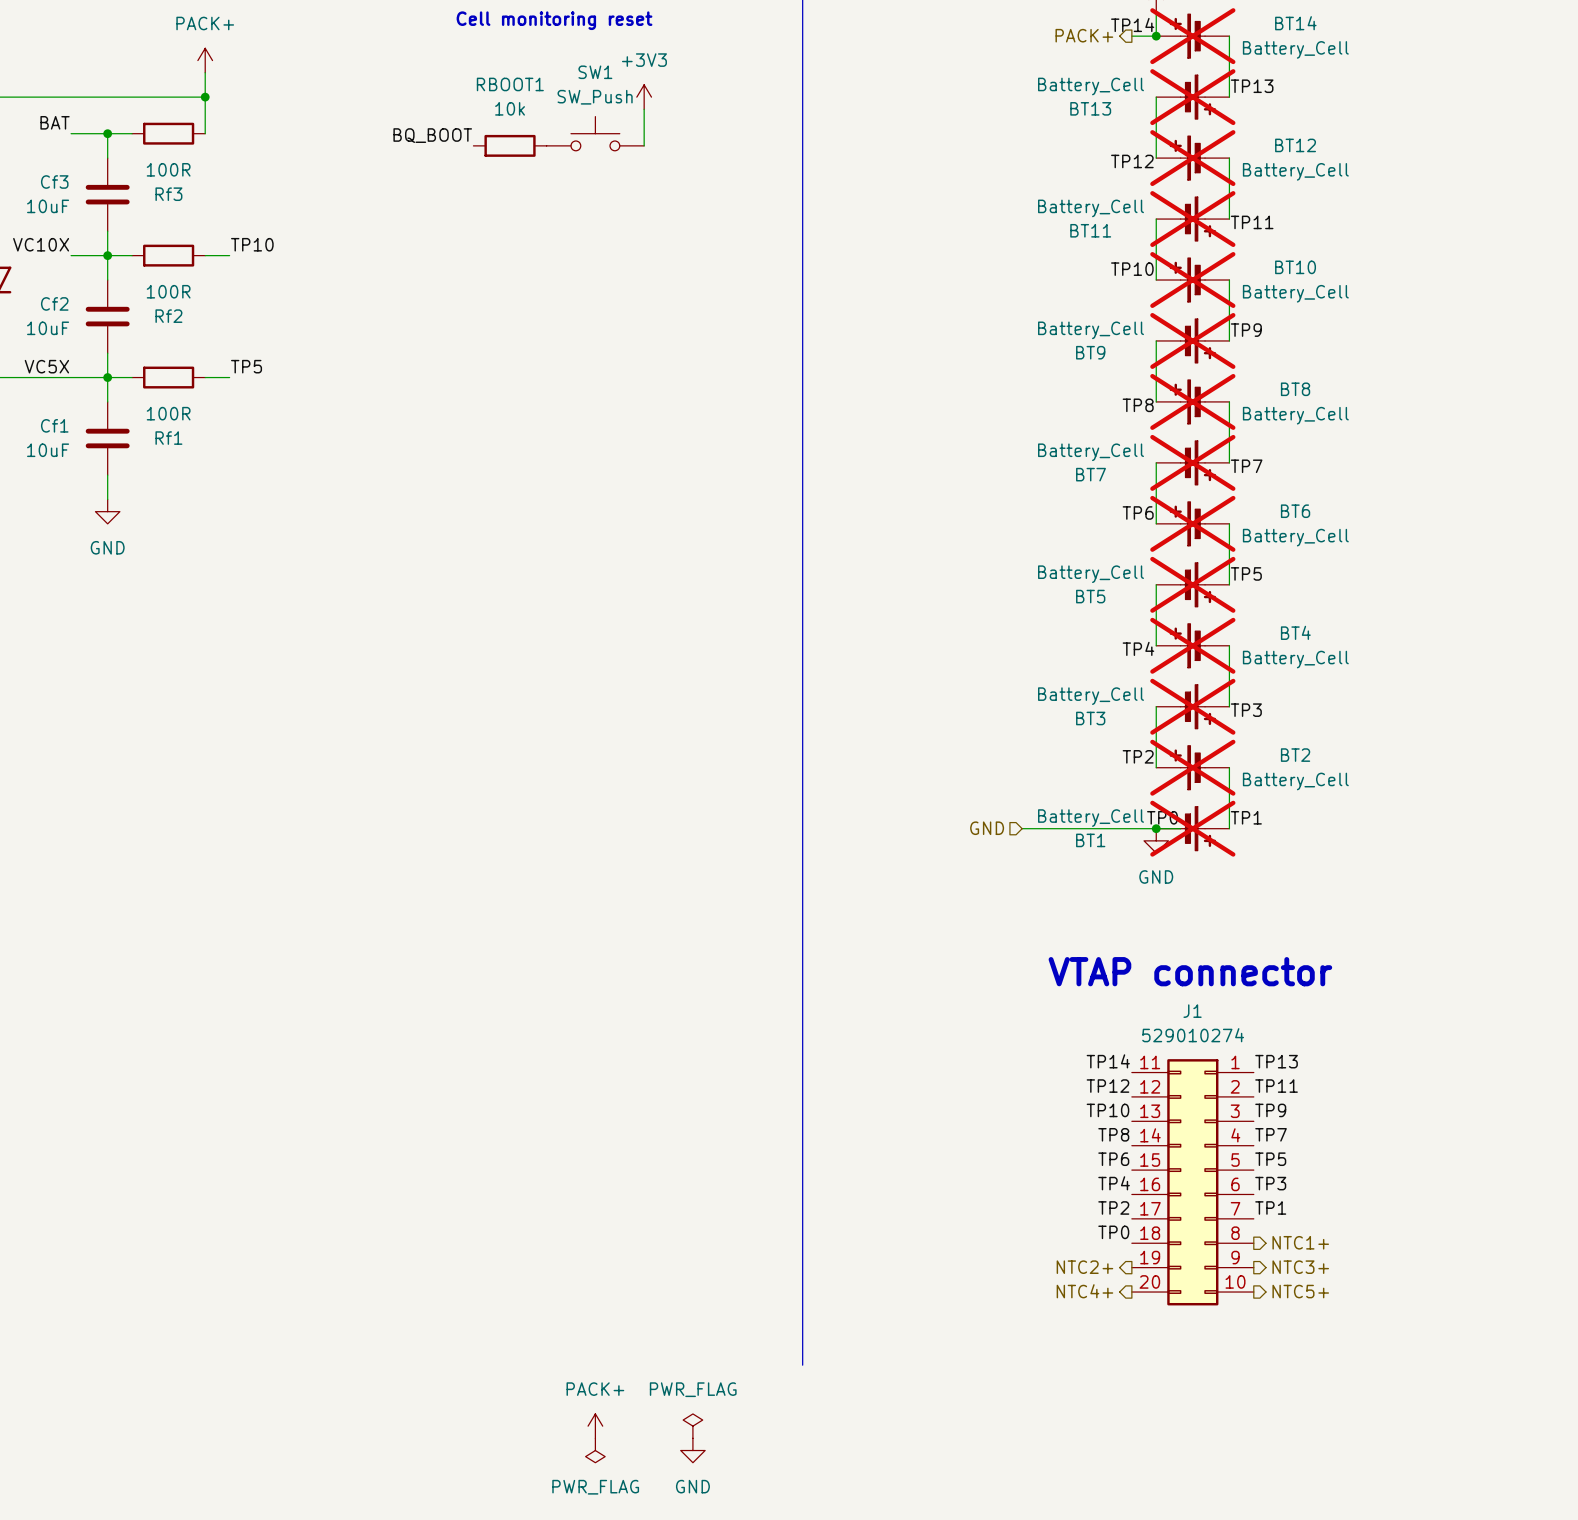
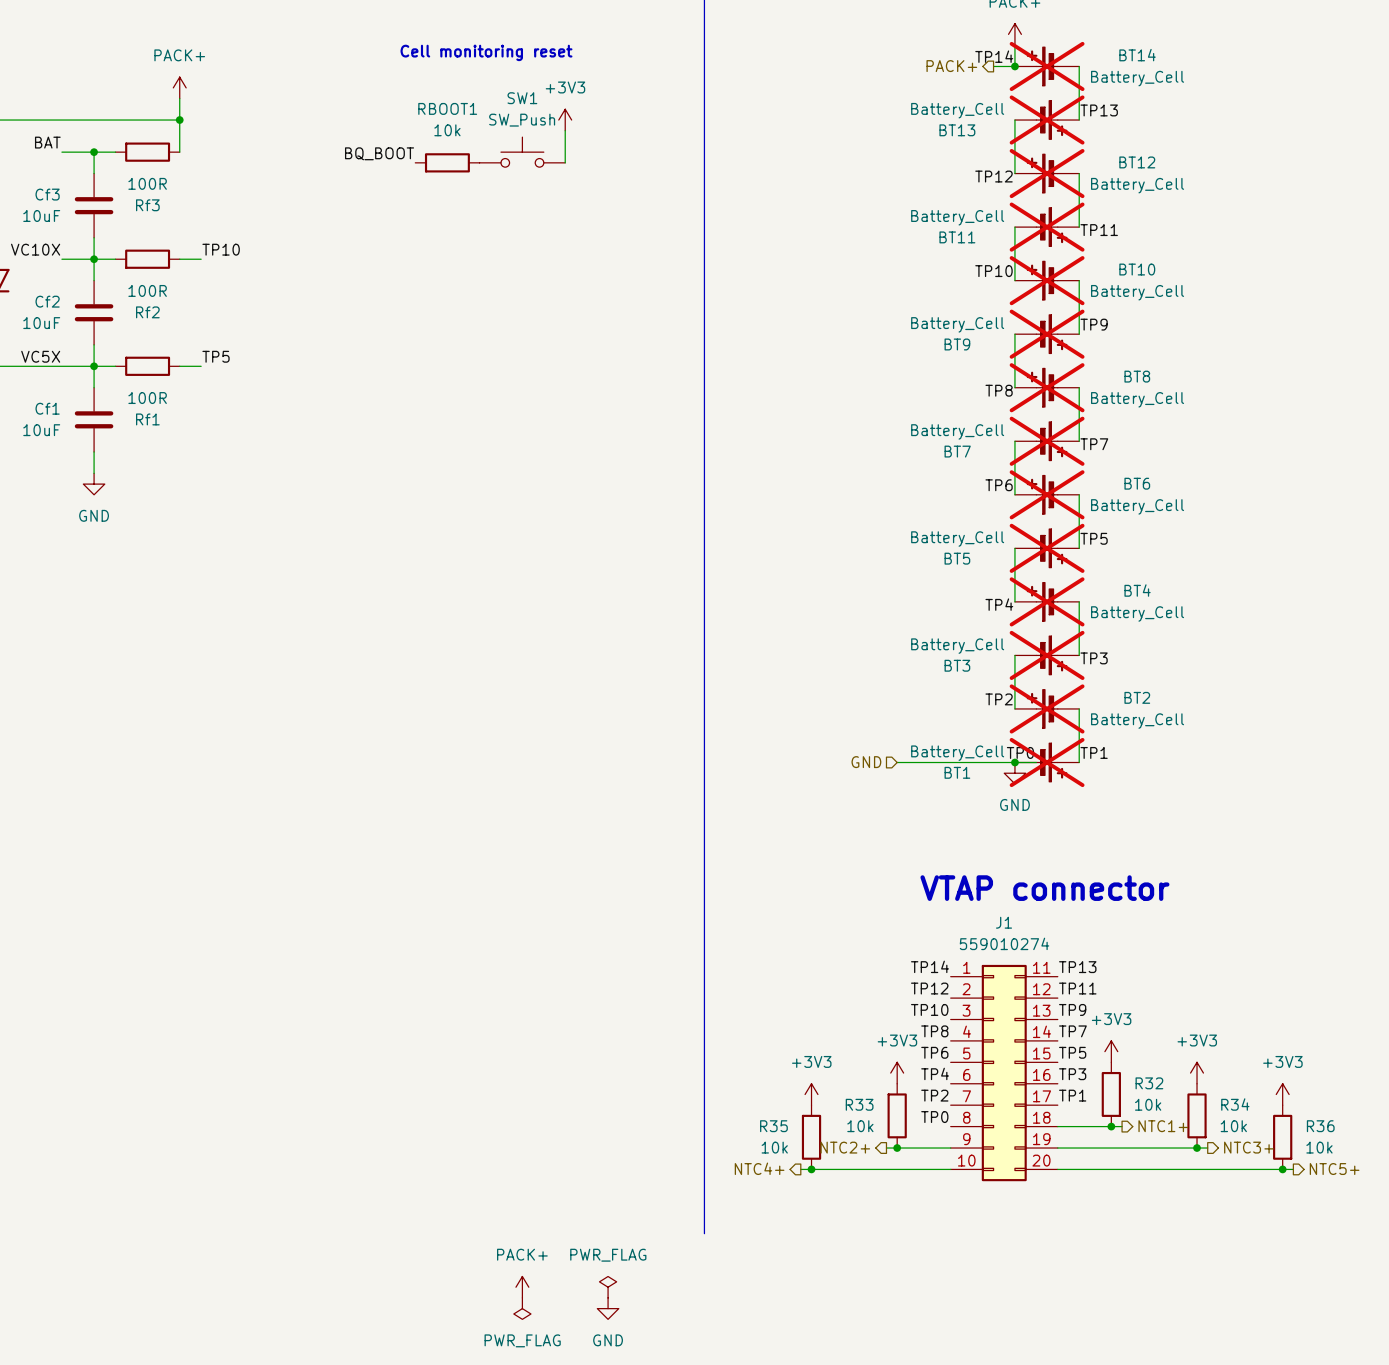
J1 value: 529010274 (1193, 1035) -> 559010274 (1004, 943)
label position: TP14 (1108, 1061) -> TP14 (929, 966)
label position: TP13 (1276, 1061) -> TP13 (1077, 967)
label position: TP12 (1107, 1086) -> TP12 (929, 988)
label position: TP11 (1276, 1086) -> TP11 (1077, 988)
label position: TP10 (1107, 1110) -> TP10 (929, 1009)
label position: TP9 (1270, 1110) -> TP9 (1072, 1009)
label position: TP8 (1113, 1134) -> TP8 (934, 1031)
label position: TP7 (1271, 1134) -> TP7 (1072, 1031)
power symbol: none -> +3V3 (1111, 1051)
label position: TP6 (1113, 1159) -> TP6 (934, 1052)
label position: TP5 (1270, 1159) -> TP5 (1072, 1052)
power symbol: none -> +3V3 (897, 1073)
J1 flip: as is (1192, 1182) -> left-right (1004, 1073)
power symbol: none -> +3V3 (1197, 1073)
label position: TP4 (1114, 1183) -> TP4 (935, 1073)
label position: TP3 (1270, 1183) -> TP3 (1072, 1074)
power symbol: none -> +3V3 (811, 1094)
R32: none -> 10k (1111, 1094)
power symbol: none -> +3V3 (1282, 1094)
label position: TP2 (1113, 1207) -> TP2 (934, 1095)
label position: TP1 (1270, 1207) -> TP1 (1072, 1095)
R33: none -> 10k (897, 1115)
R34: none -> 10k (1197, 1115)
label position: TP0 (1113, 1232) -> TP0 (934, 1117)
hierarchical label position: NTC1+ (1300, 1242) -> NTC1+ (1163, 1126)
junction: none -> (1111, 1126)
R35: none -> 10k (811, 1137)
R36: none -> 10k (1282, 1137)
wire: none -> (886, 1148) (950, 1148)
junction: none -> (897, 1148)
hierarchical label position: NTC2+ (1084, 1267) -> NTC2+ (845, 1147)
wire: none -> (1057, 1148) (1207, 1148)
hierarchical label position: NTC3+ (1300, 1267) -> NTC3+ (1248, 1147)
junction: none -> (1197, 1148)
hierarchical label position: NTC4+ (1084, 1291) -> NTC4+ (759, 1168)
hierarchical label position: NTC5+ (1300, 1291) -> NTC5+ (1334, 1169)
wire: none -> (800, 1169) (950, 1169)
junction: none -> (811, 1169)
wire: none -> (1057, 1169) (1293, 1169)
junction: none -> (1282, 1169)

